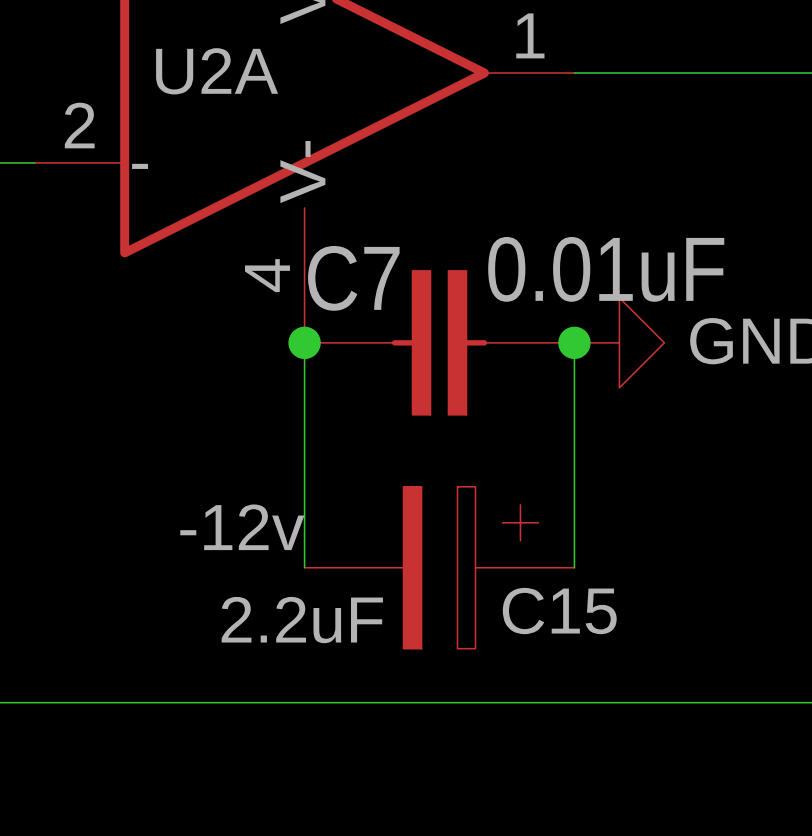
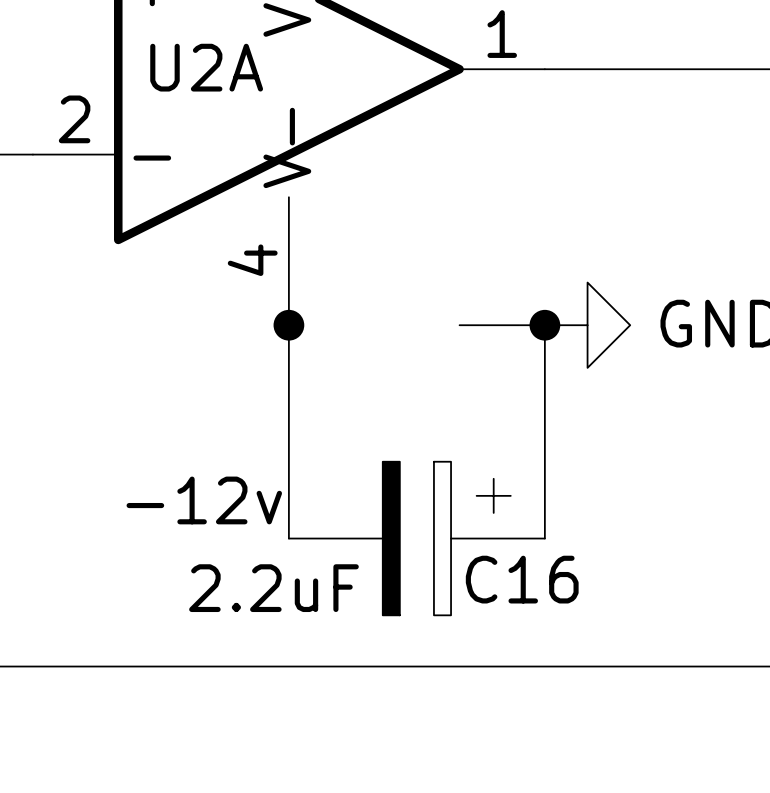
C7: 0.01uF (439, 342) -> none
C15 name: C15 (559, 611) -> C16 (522, 579)

